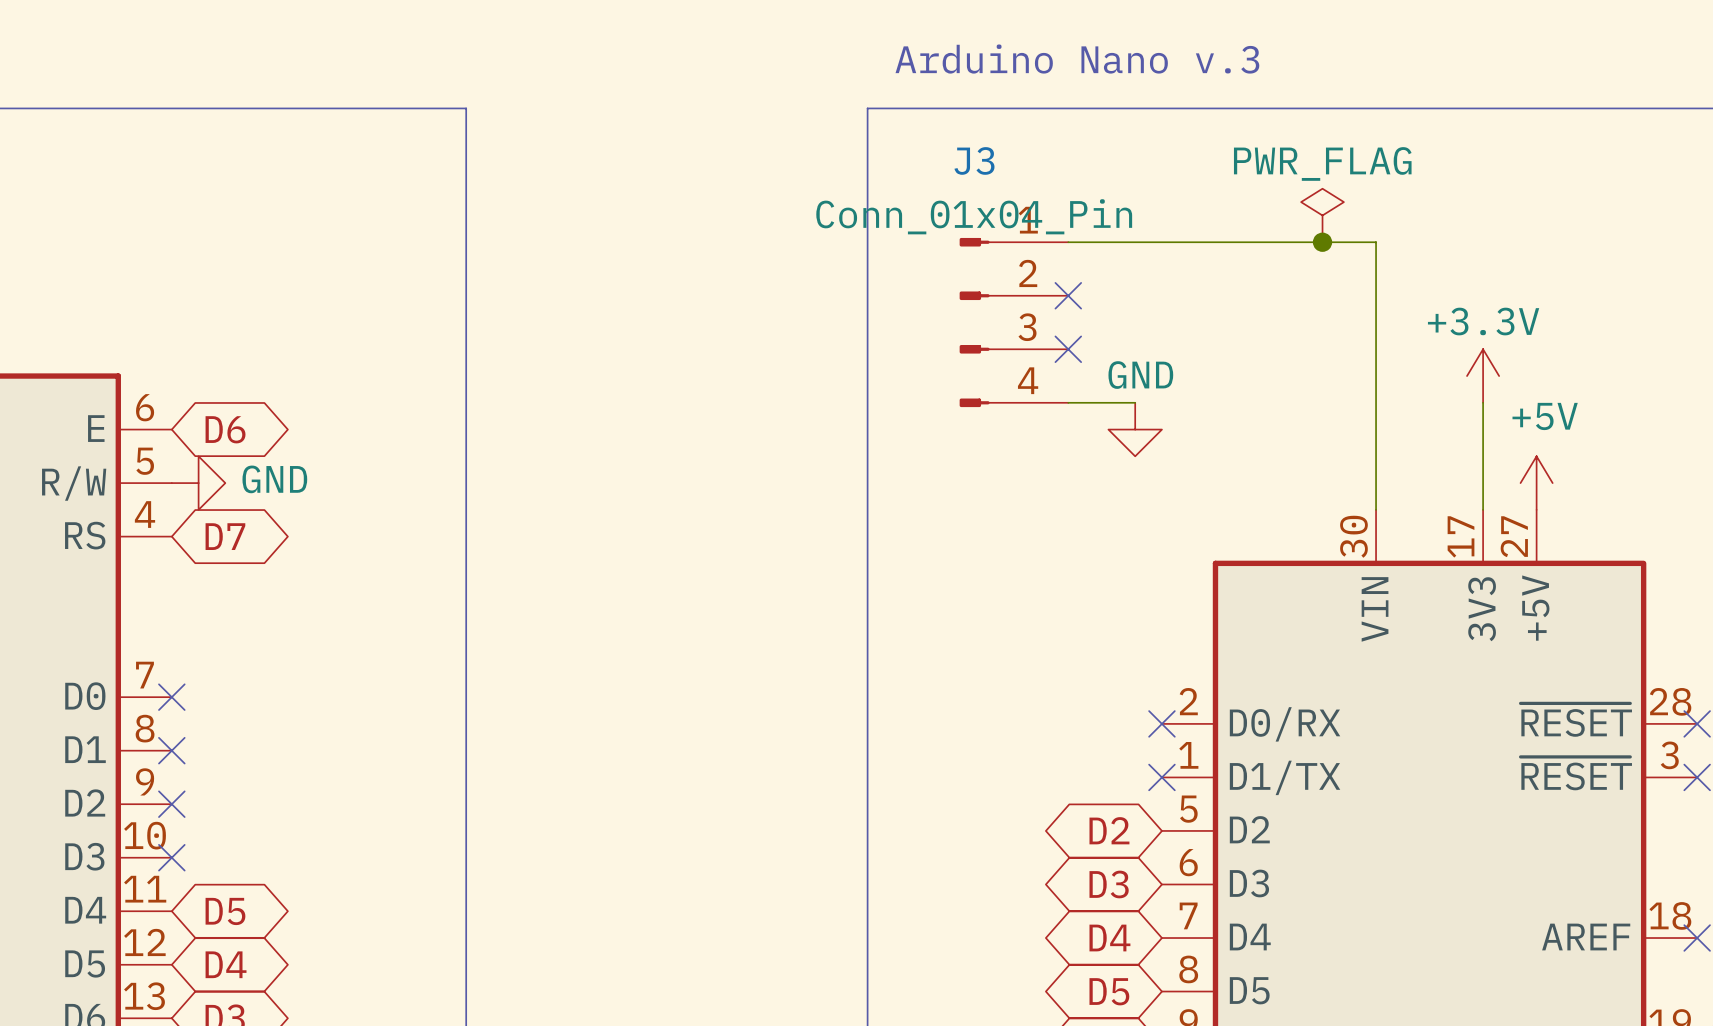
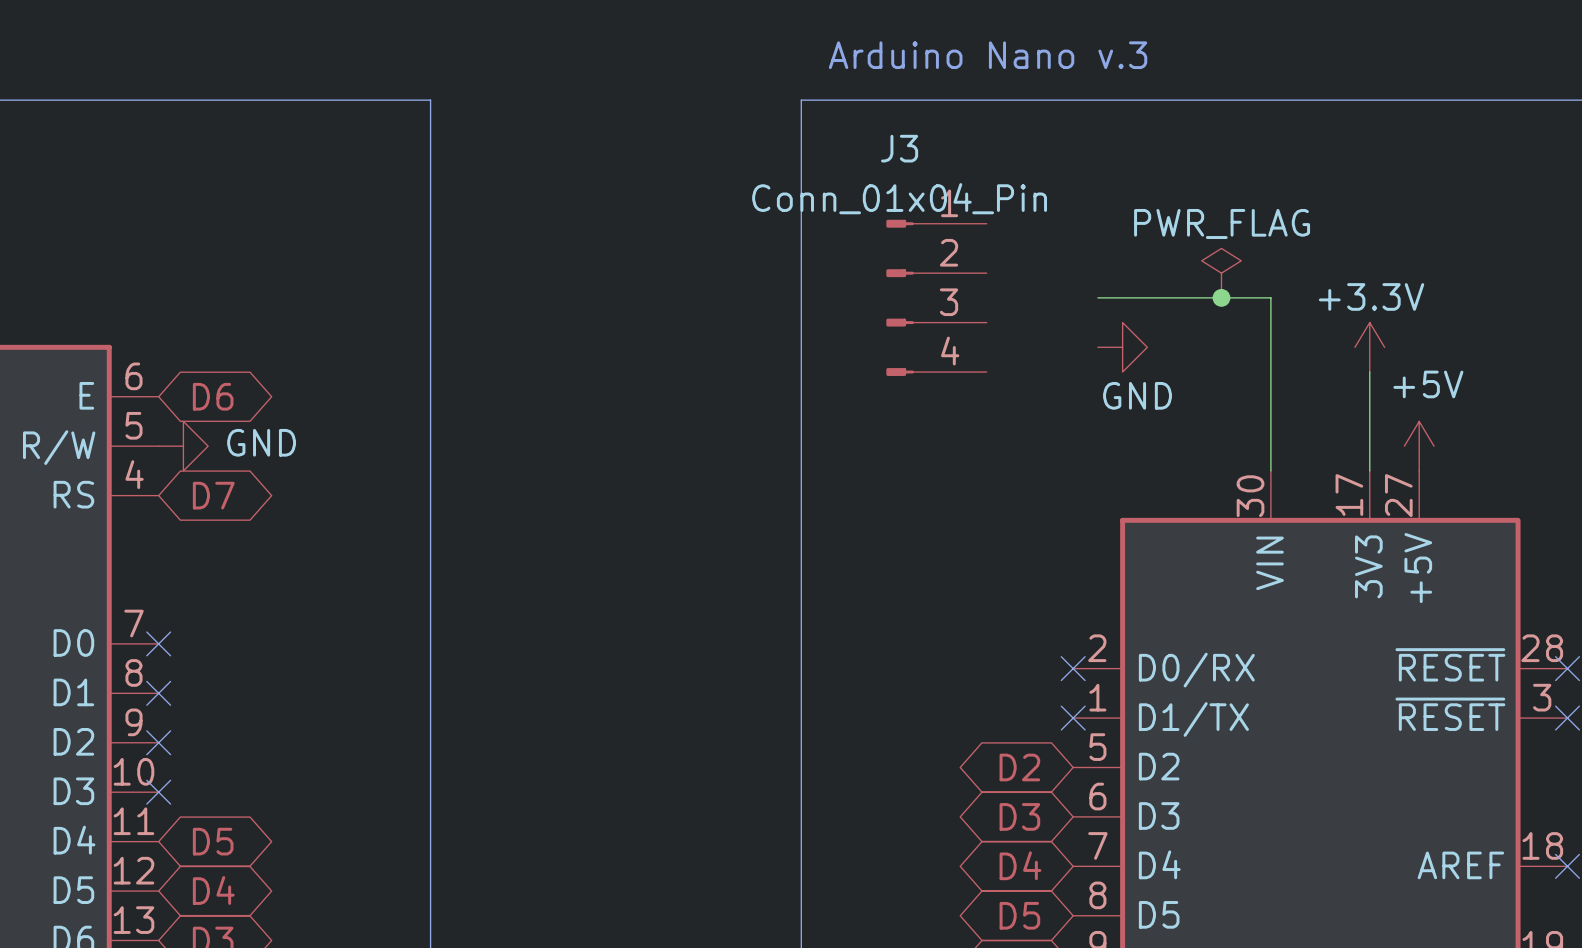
power symbol position: PWR_FLAG (1322, 215) -> PWR_FLAG (1221, 273)
wire: (1068, 242) (1376, 242) (1376, 322) -> (1097, 297) (1270, 297)
junction position: (1322, 242) -> (1221, 297)
no-connect mark: (1068, 295) -> none
no-connect mark: (1068, 349) -> none
power symbol text position: GND (1140, 375) -> GND (1137, 395)
wire: (1068, 402) (1135, 402) -> none
power symbol rotation: 0° (1135, 429) -> 90° counterclockwise (1122, 347)
power symbol position: GND (1135, 429) -> GND (1122, 347)

